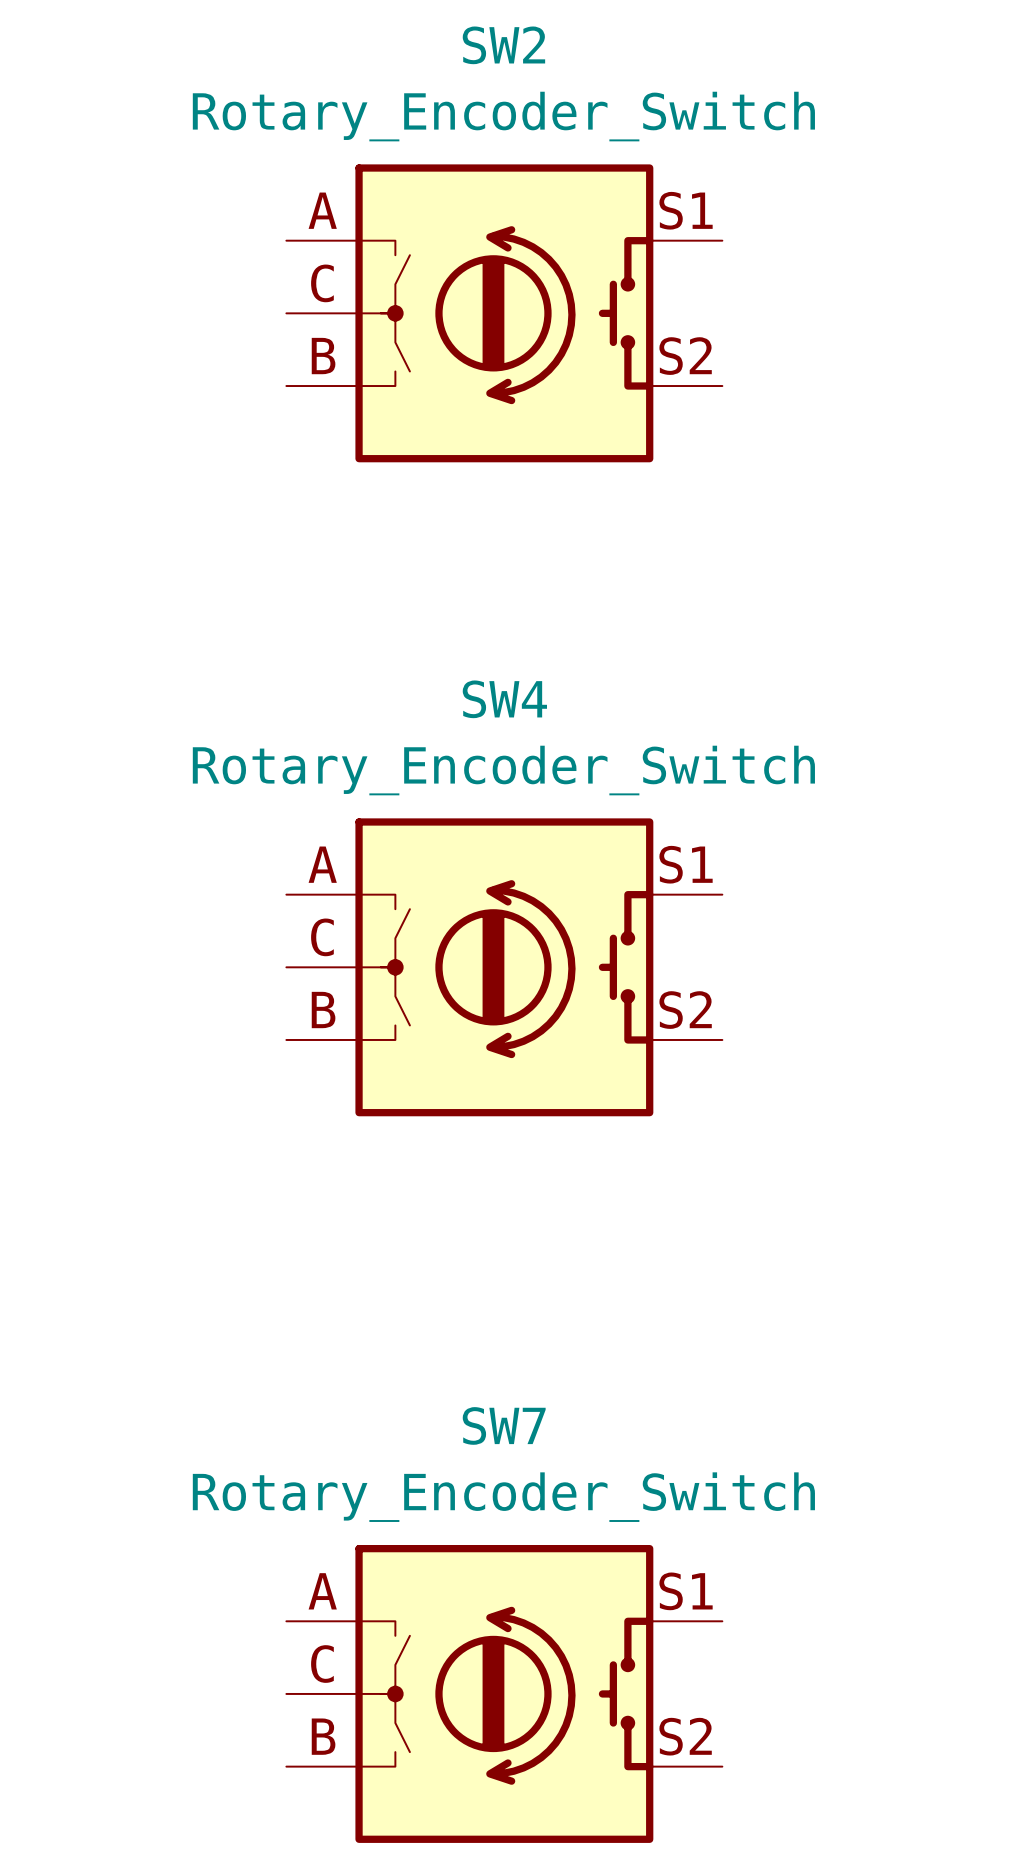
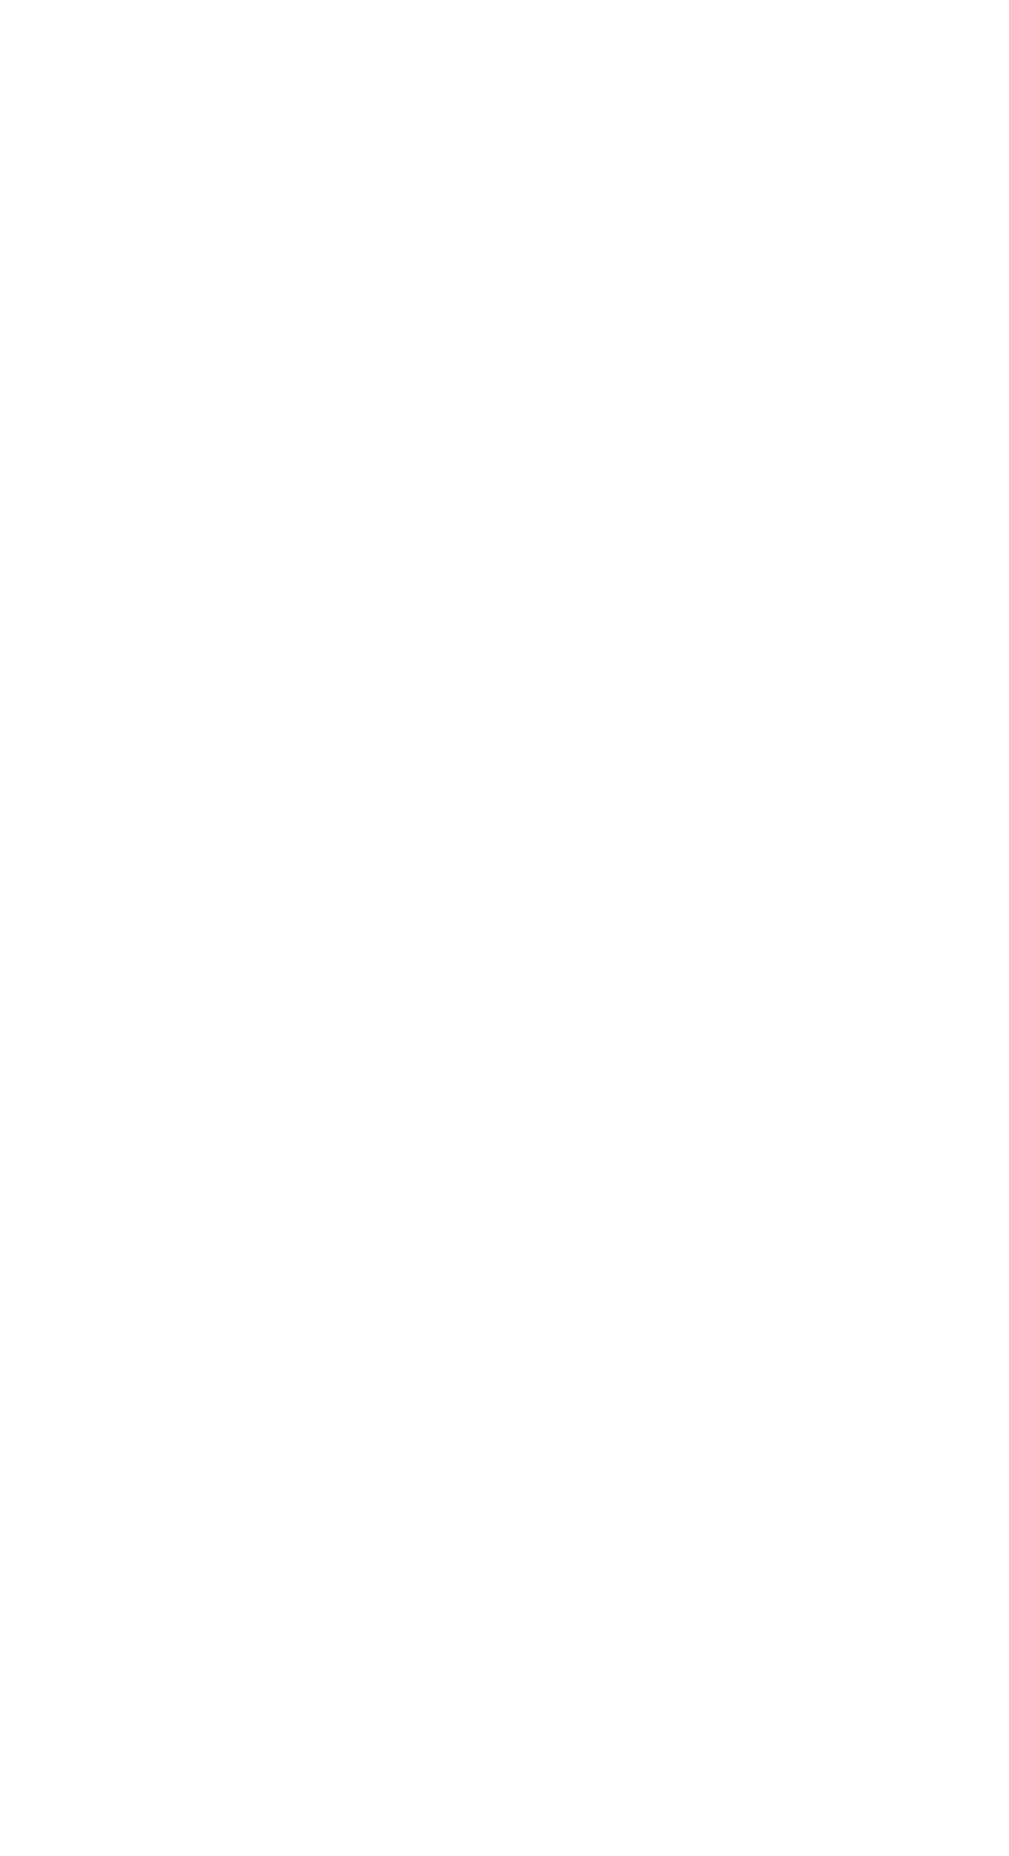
SW2: Rotary_Encoder_Switch (504, 313) -> none
SW4: Rotary_Encoder_Switch (504, 967) -> none
SW7: Rotary_Encoder_Switch (504, 1693) -> none

